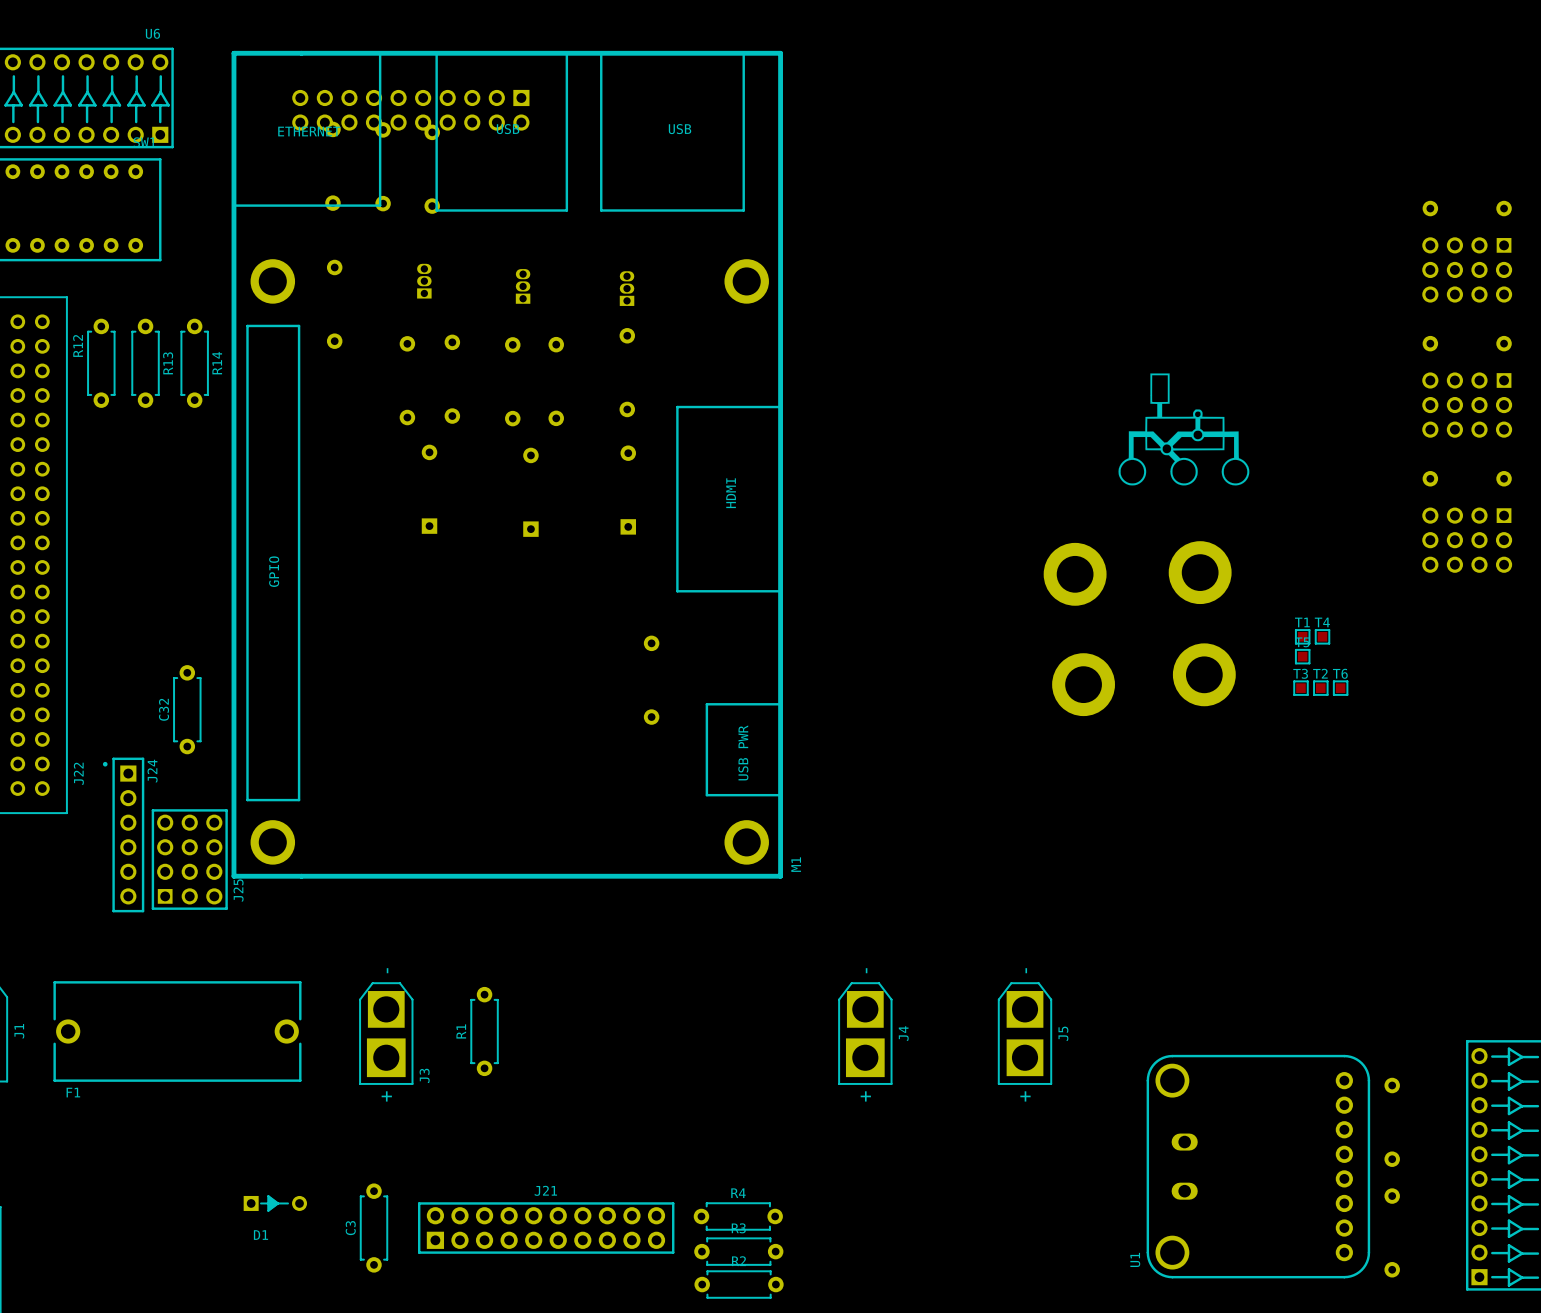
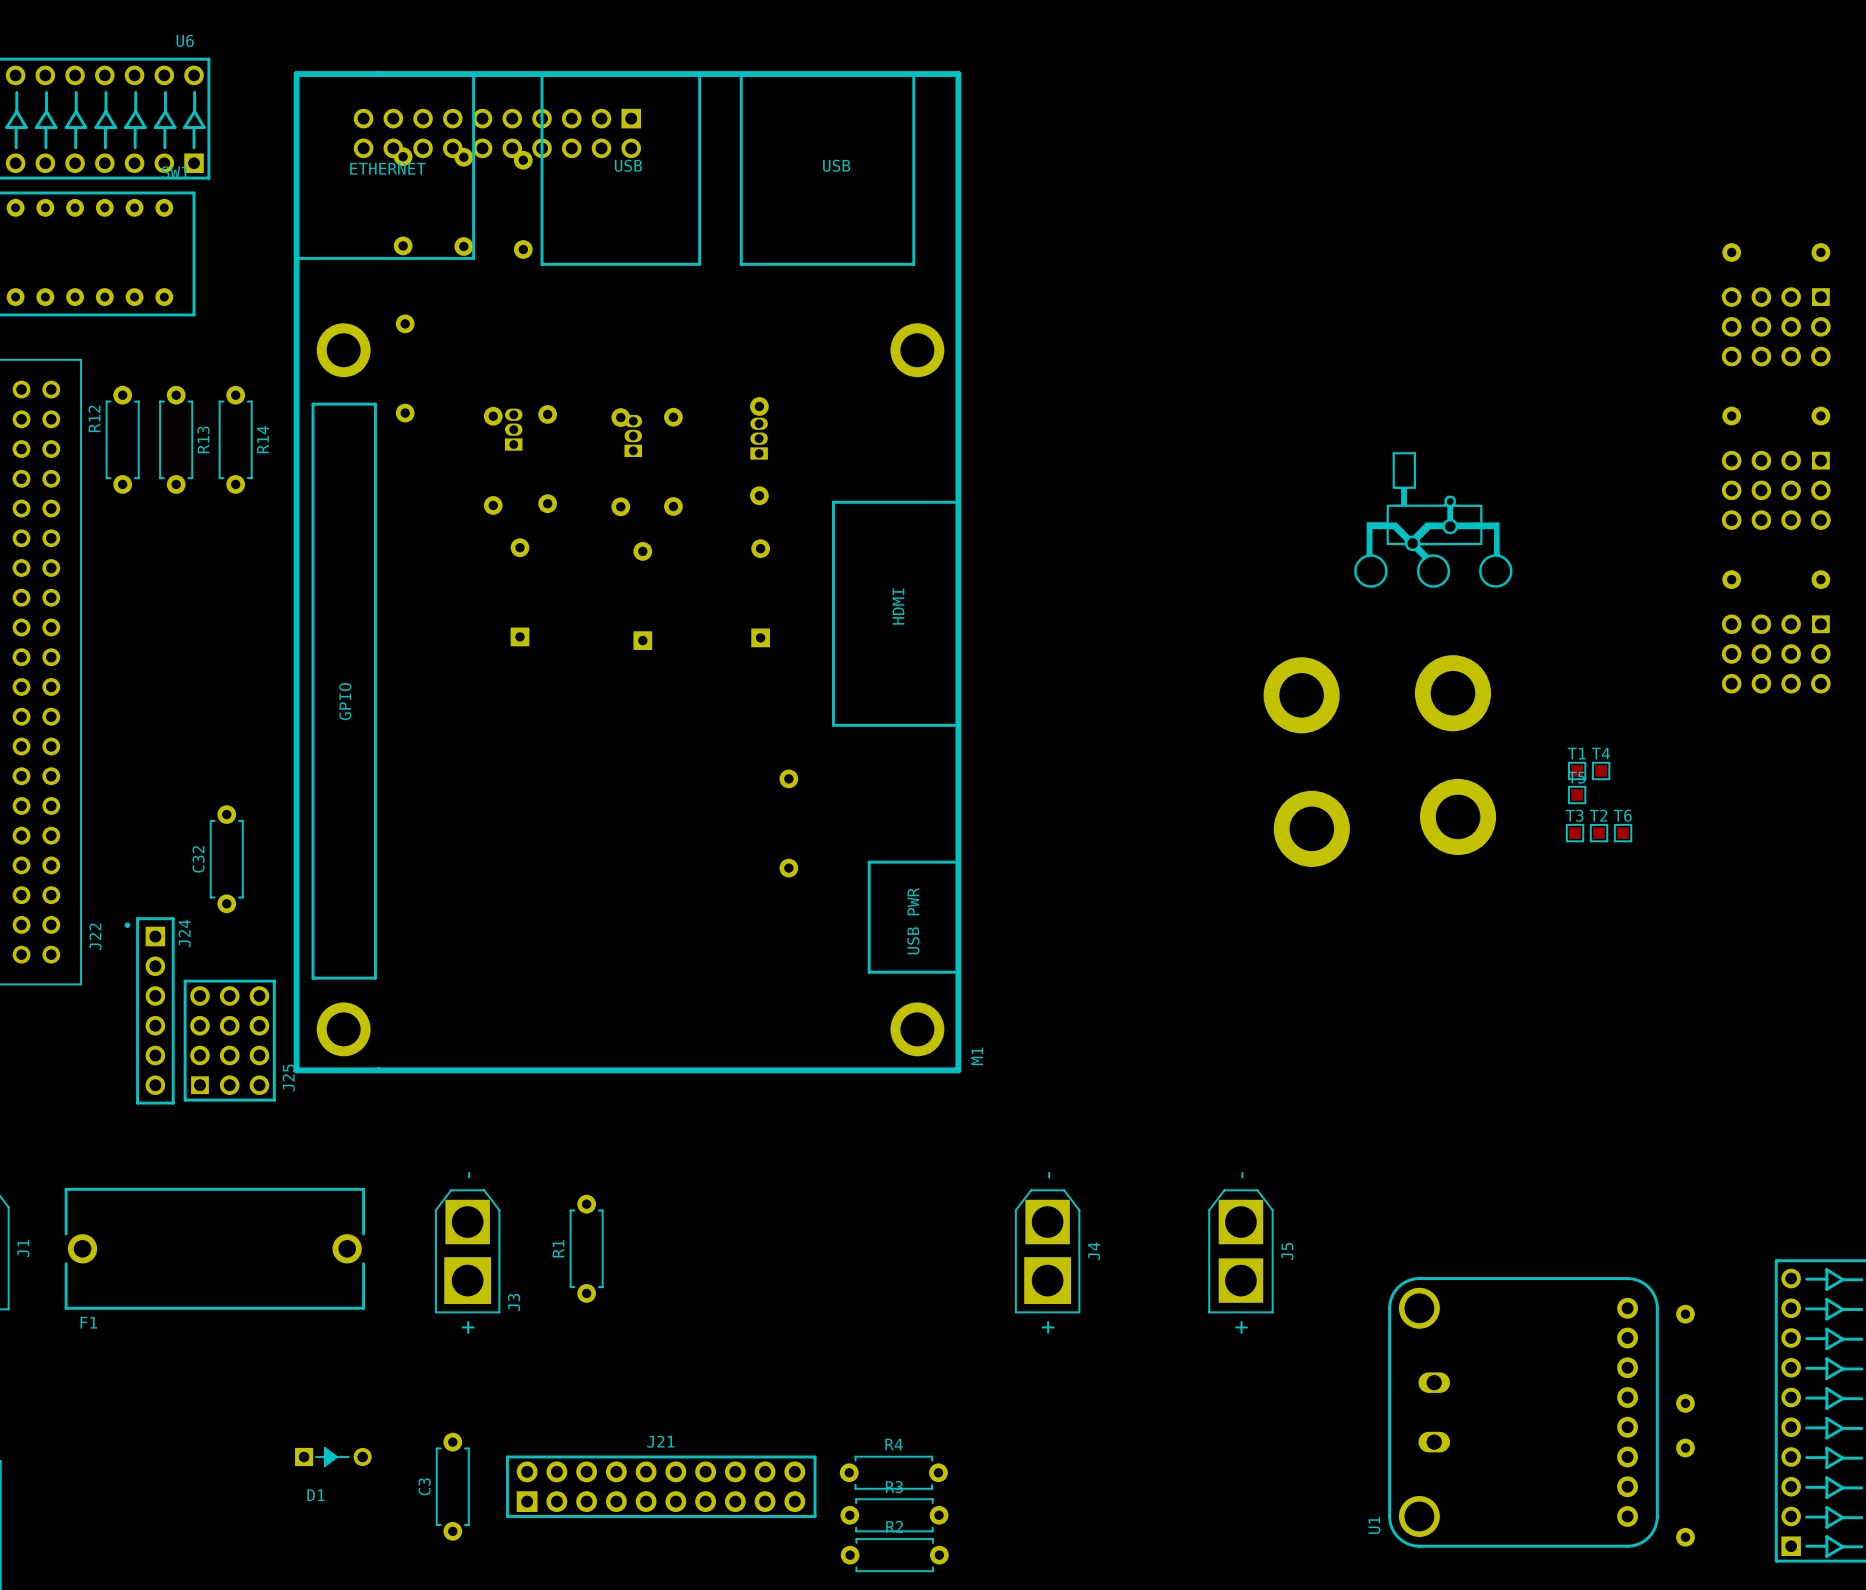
part: (424, 281) -> none
part: (523, 286) -> none
part: (627, 288) -> none
part: none -> (513, 429)
part: none -> (633, 435)
part: none -> (759, 438)
M1 position: (507, 464) -> (627, 572)

